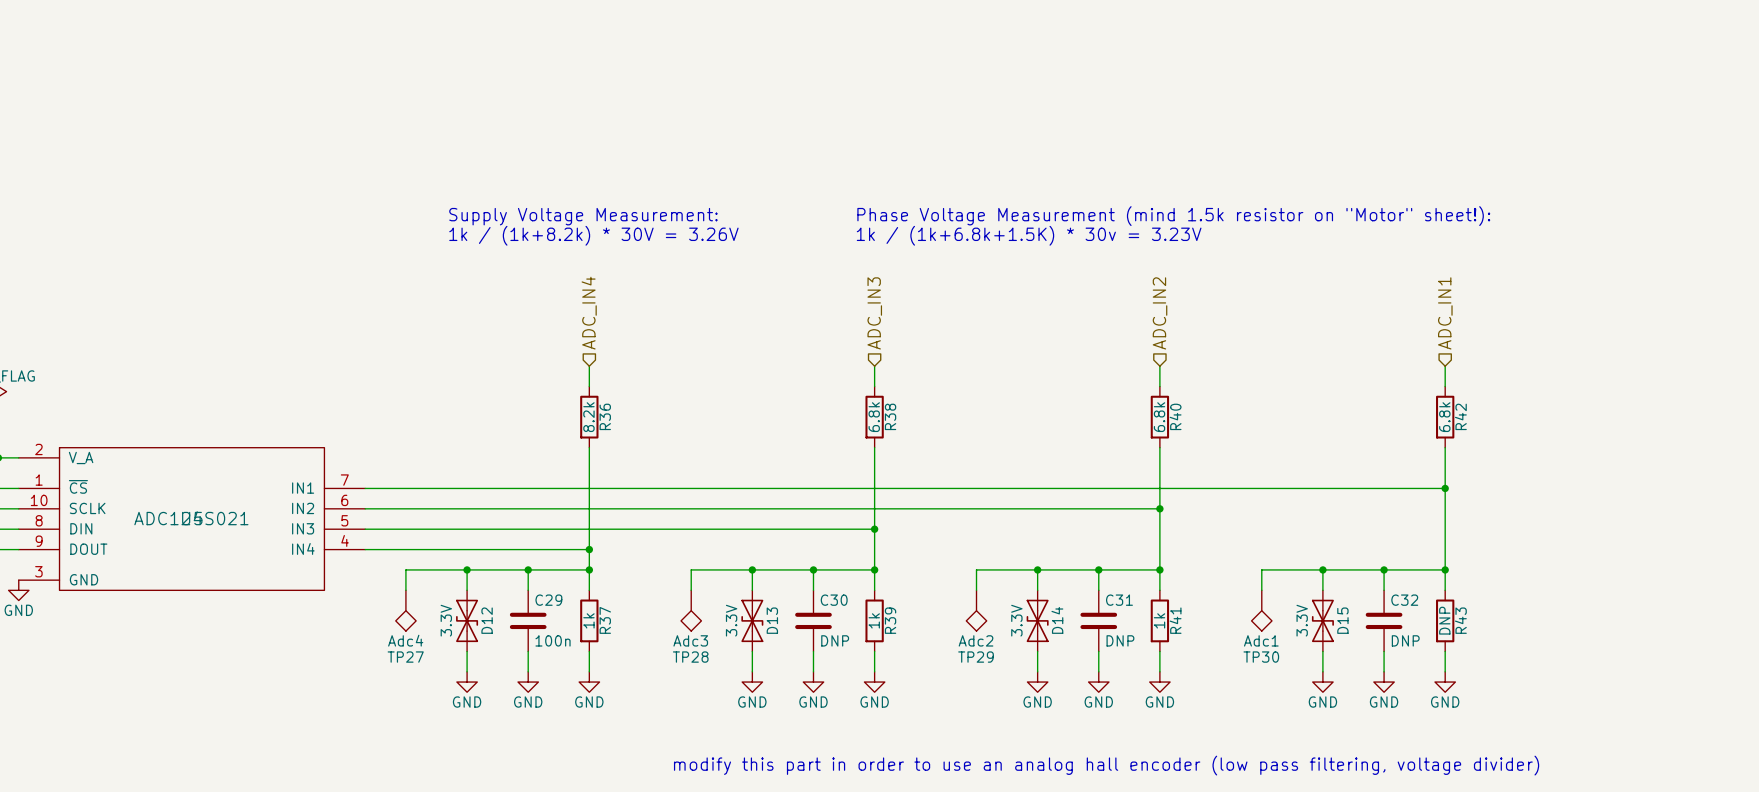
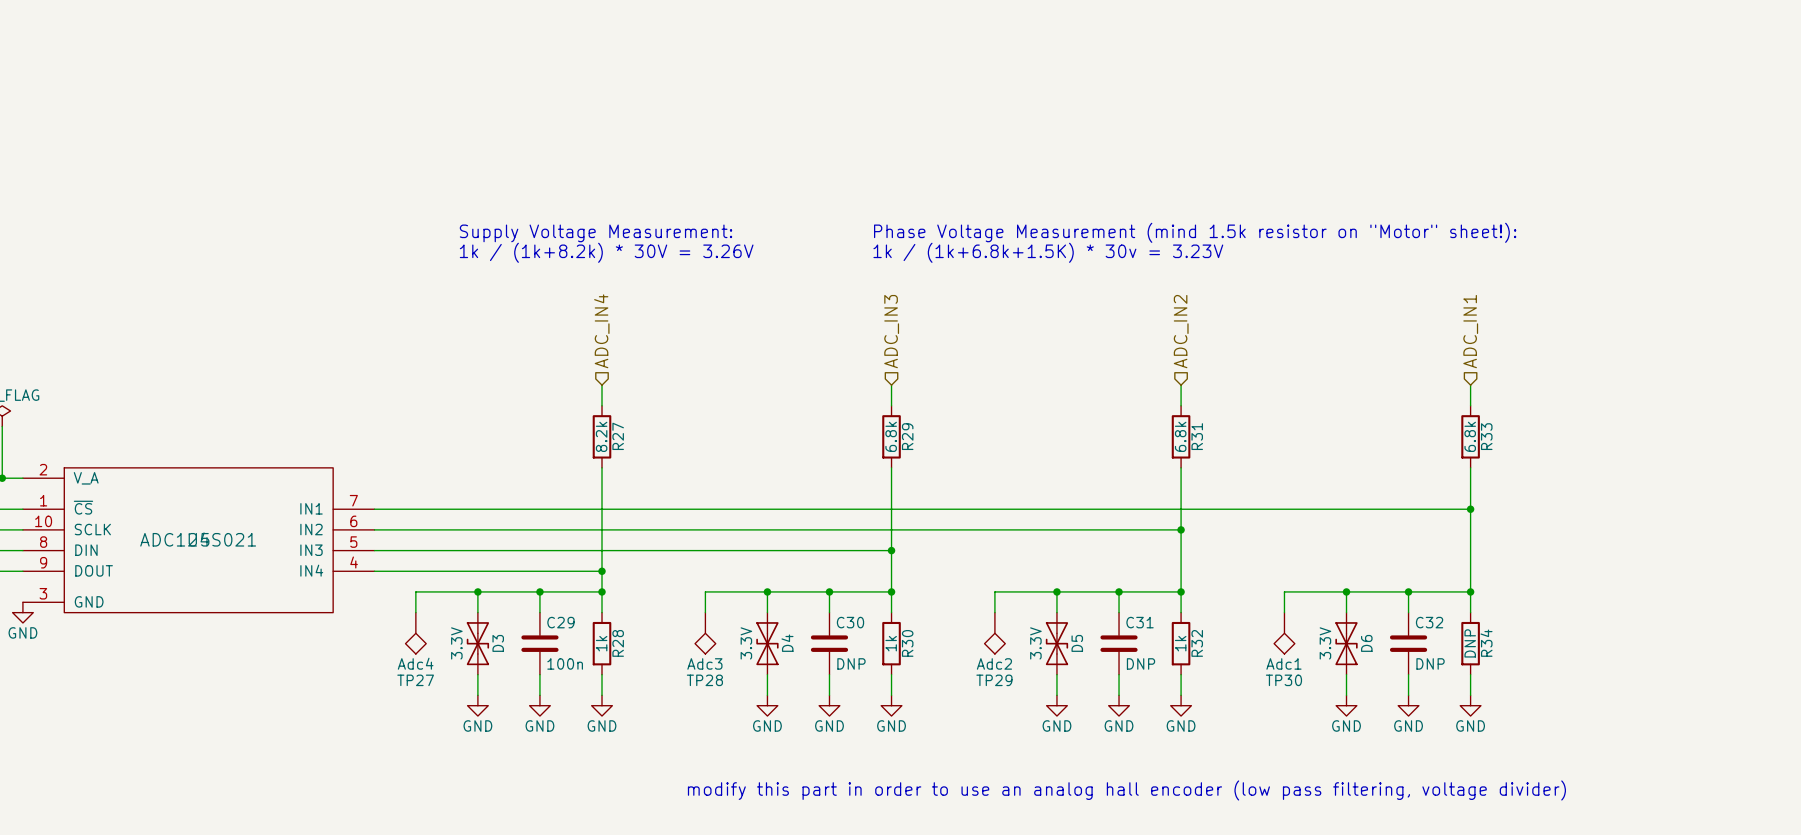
R36 name: R36 (605, 416) -> R27 (618, 436)
R38 name: R38 (890, 416) -> R29 (907, 436)
R40 name: R40 (1175, 416) -> R31 (1197, 436)
R42 name: R42 (1460, 416) -> R33 (1486, 436)
D12 name: D12 (487, 620) -> D3 (498, 643)
R37 name: R37 (605, 620) -> R28 (618, 643)
D13 name: D13 (772, 620) -> D4 (787, 643)
R39 name: R39 (890, 620) -> R30 (907, 643)
D14 name: D14 (1057, 620) -> D5 (1077, 643)
R41 name: R41 (1175, 620) -> R32 (1197, 643)
D15 name: D15 (1342, 620) -> D6 (1366, 643)
R43 name: R43 (1460, 620) -> R34 (1486, 643)

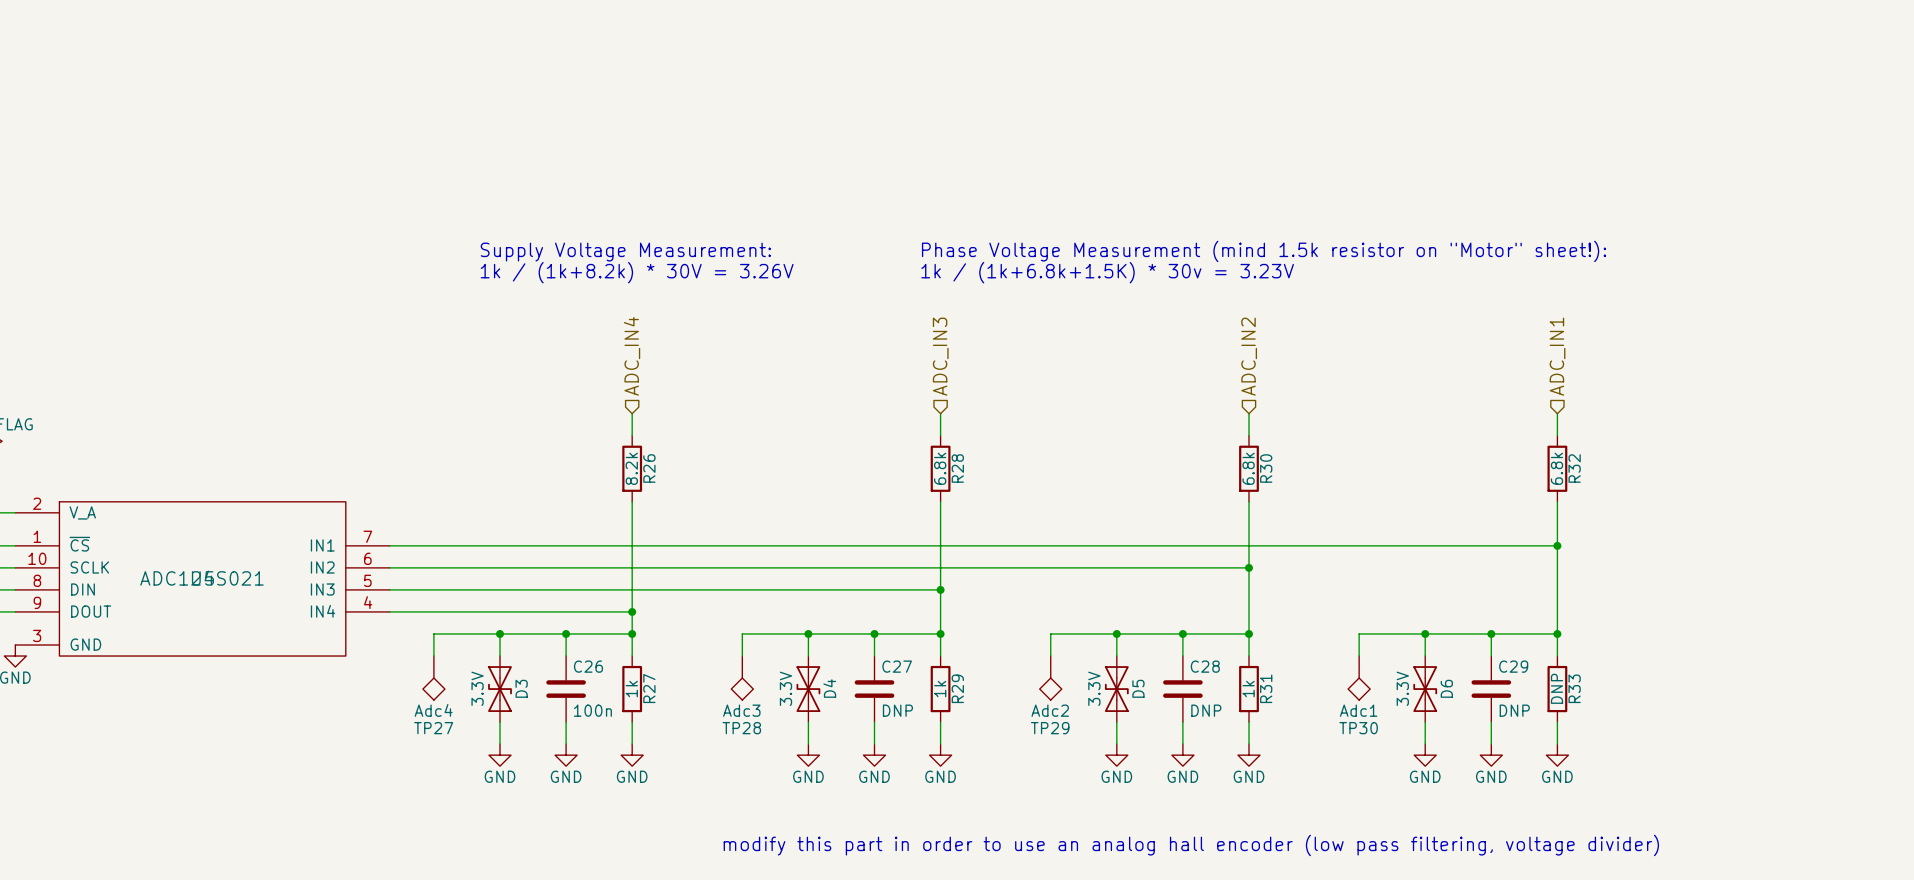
R27 name: R27 (618, 436) -> R26 (649, 468)
R29 name: R29 (907, 436) -> R28 (957, 468)
R31 name: R31 (1197, 436) -> R30 (1266, 468)
R33 name: R33 (1486, 436) -> R32 (1574, 468)
C29 name: C29 (560, 622) -> C26 (588, 666)
C30 name: C30 (850, 622) -> C27 (897, 666)
C31 name: C31 (1140, 622) -> C28 (1205, 666)
C32 name: C32 (1429, 622) -> C29 (1513, 666)
R28 name: R28 (618, 643) -> R27 (649, 688)
R30 name: R30 (907, 643) -> R29 (957, 688)
R32 name: R32 (1197, 643) -> R31 (1266, 688)
R34 name: R34 (1486, 643) -> R33 (1574, 688)

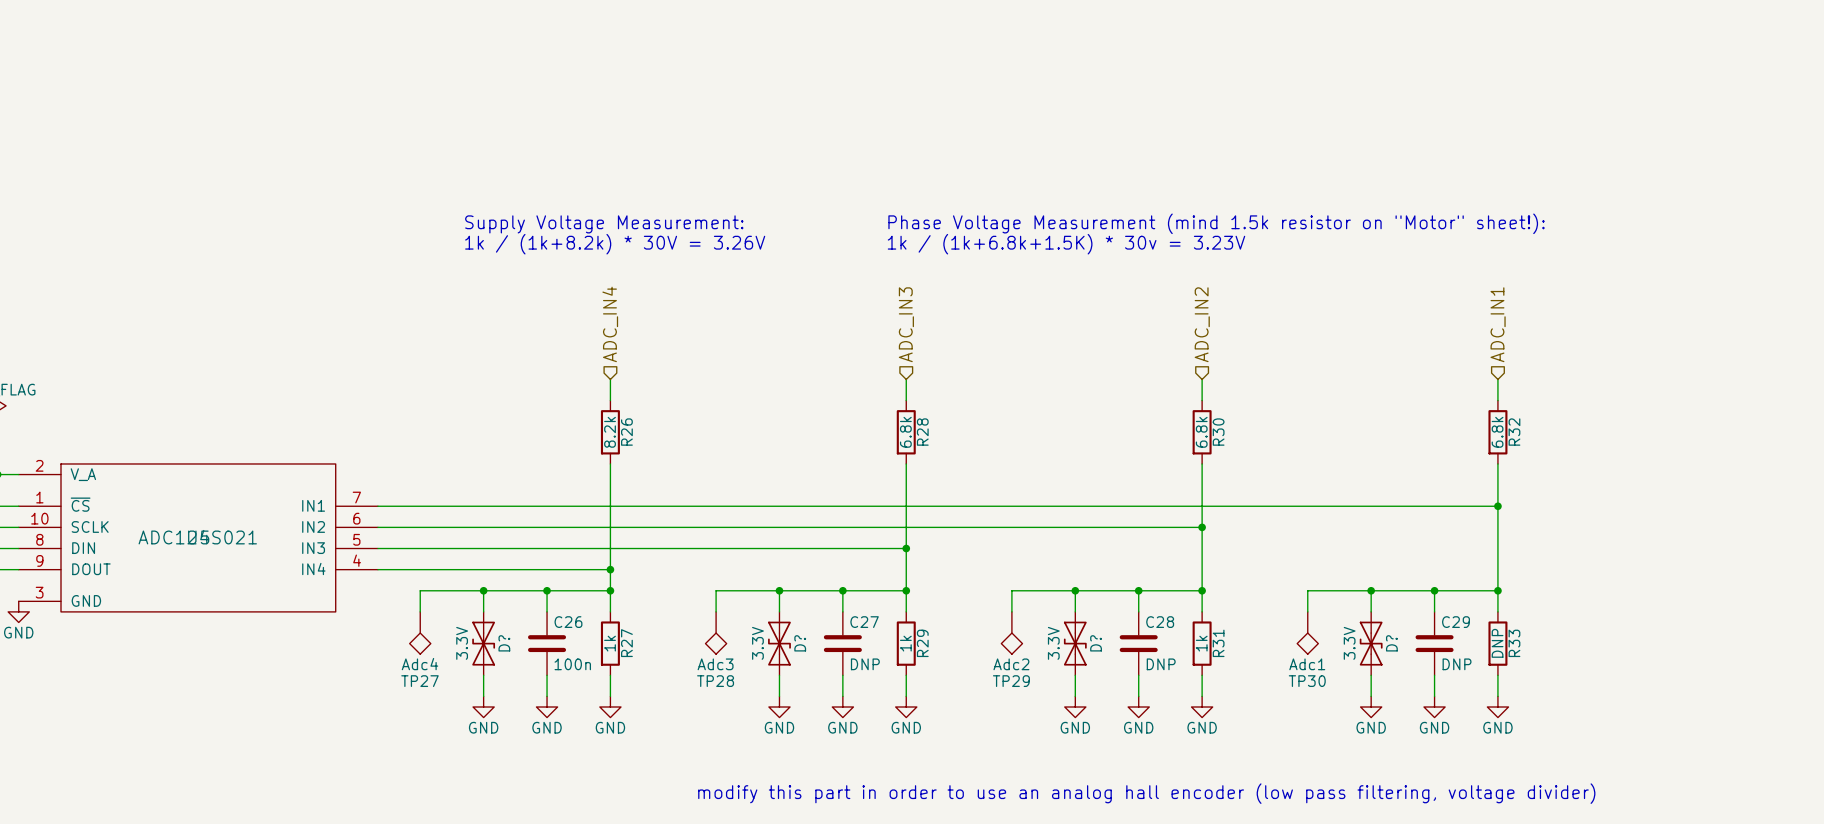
D3 name: D3 (521, 688) -> D? (504, 643)
D4 name: D4 (829, 688) -> D? (800, 643)
D5 name: D5 (1138, 688) -> D? (1096, 643)
D6 name: D6 (1446, 688) -> D? (1391, 643)

